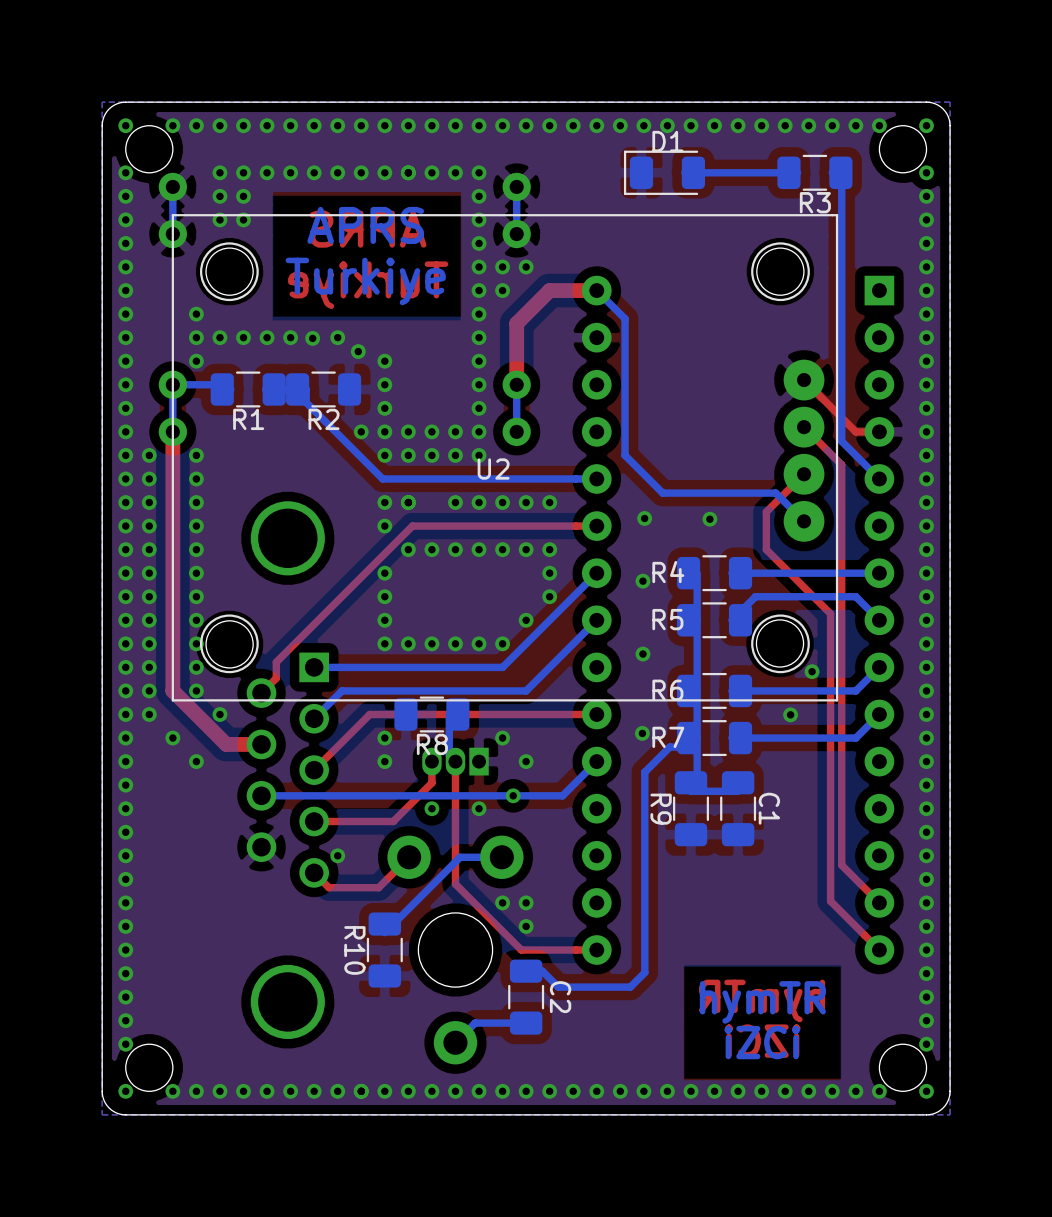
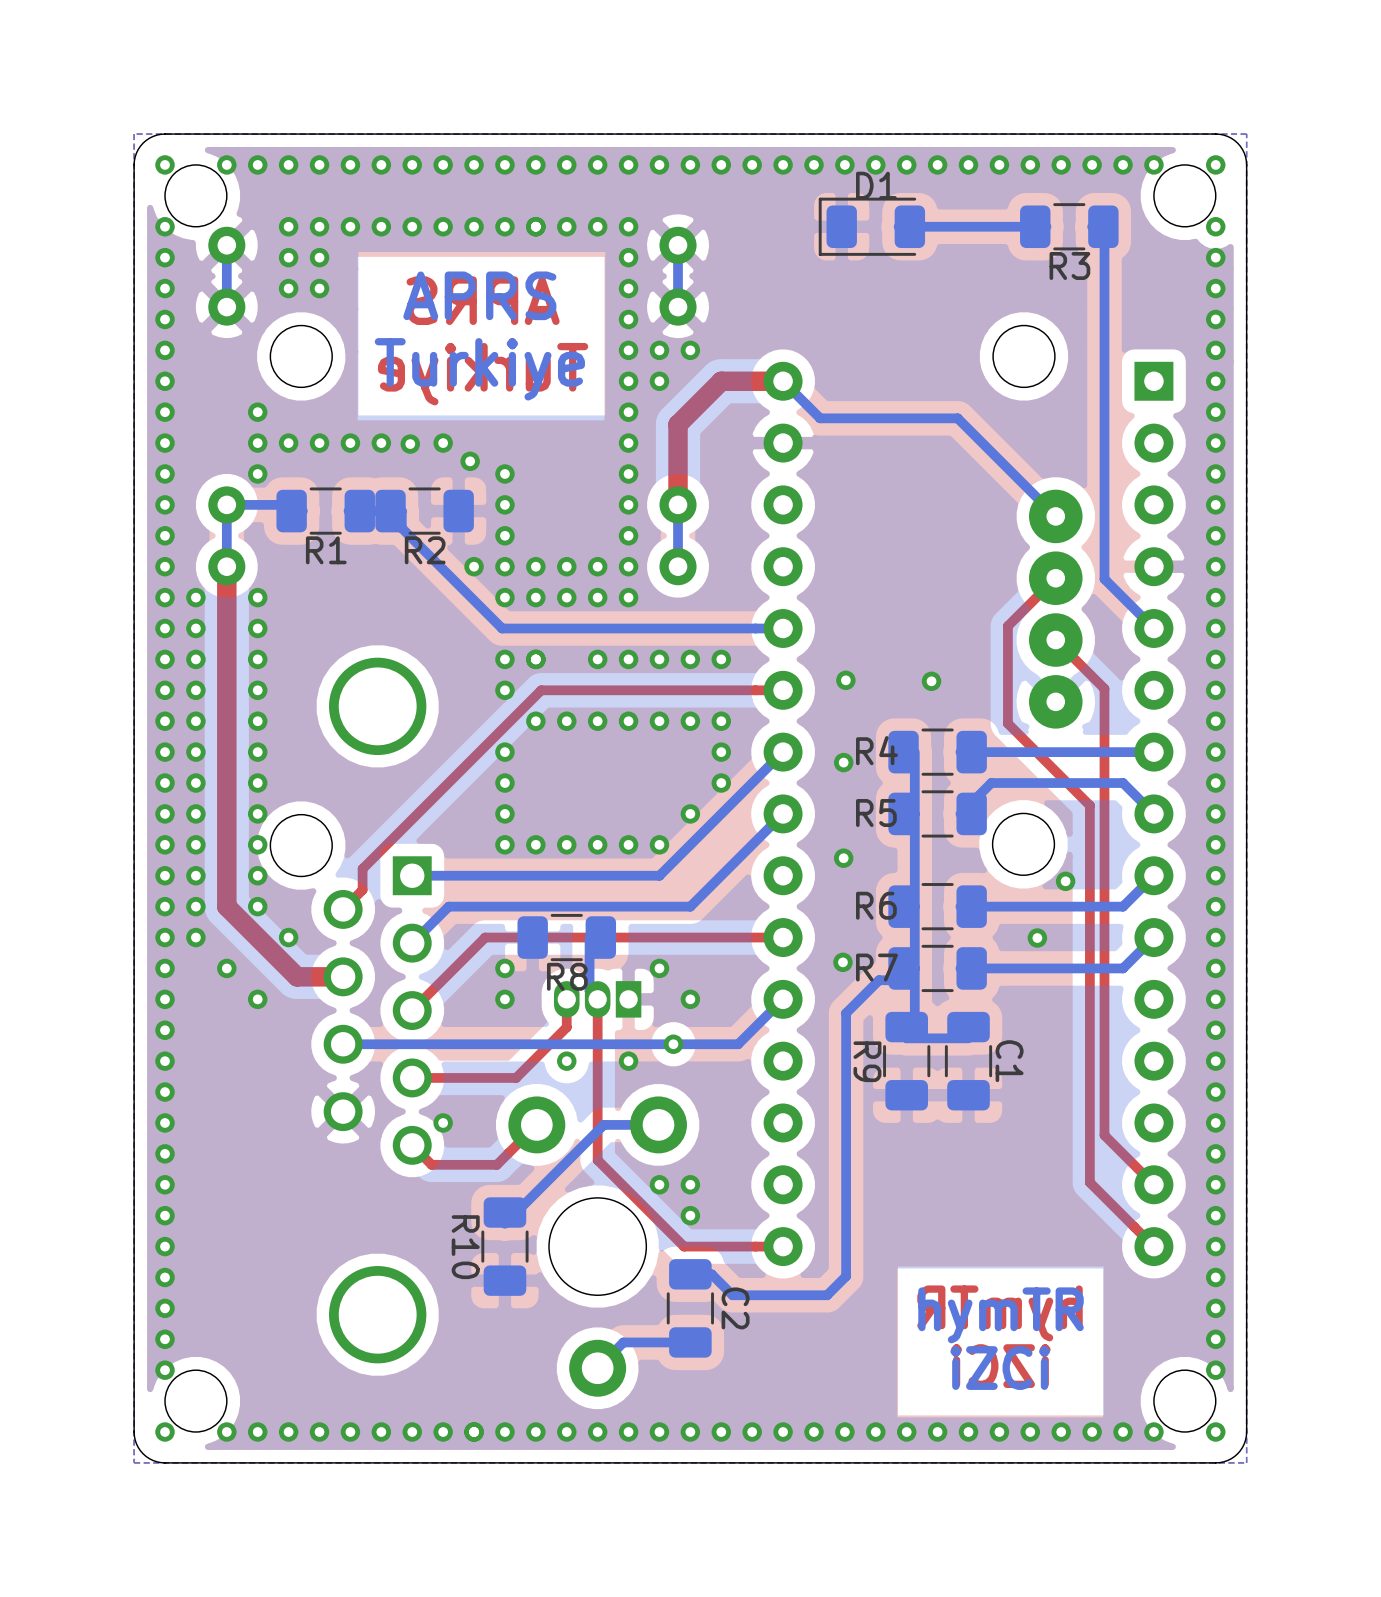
bottom track: (625, 318) (625, 455) (662, 493) (775, 493) (804, 521) -> (820, 418) (957, 418) (1055, 516)
top track: (804, 380) (855, 431) (879, 431) -> none
top track: (804, 427) (841, 464) (841, 524) -> (1055, 640) (1104, 688)
U2 side: bottom (504, 457) -> top (1055, 609)
top track: (804, 474) (766, 511) (766, 549) (768, 551) -> (1055, 578) (1007, 626) (1007, 723)

